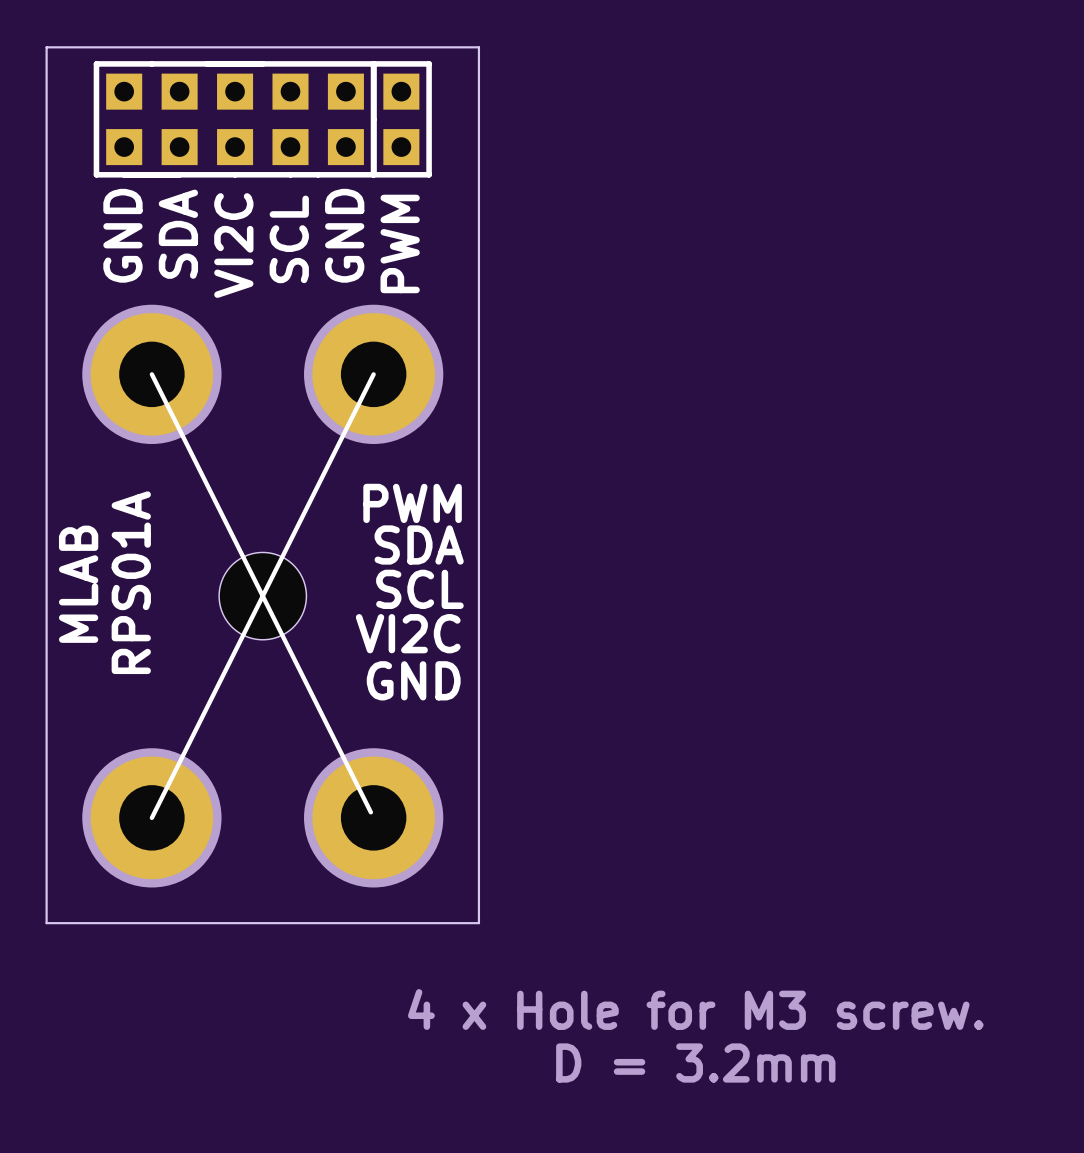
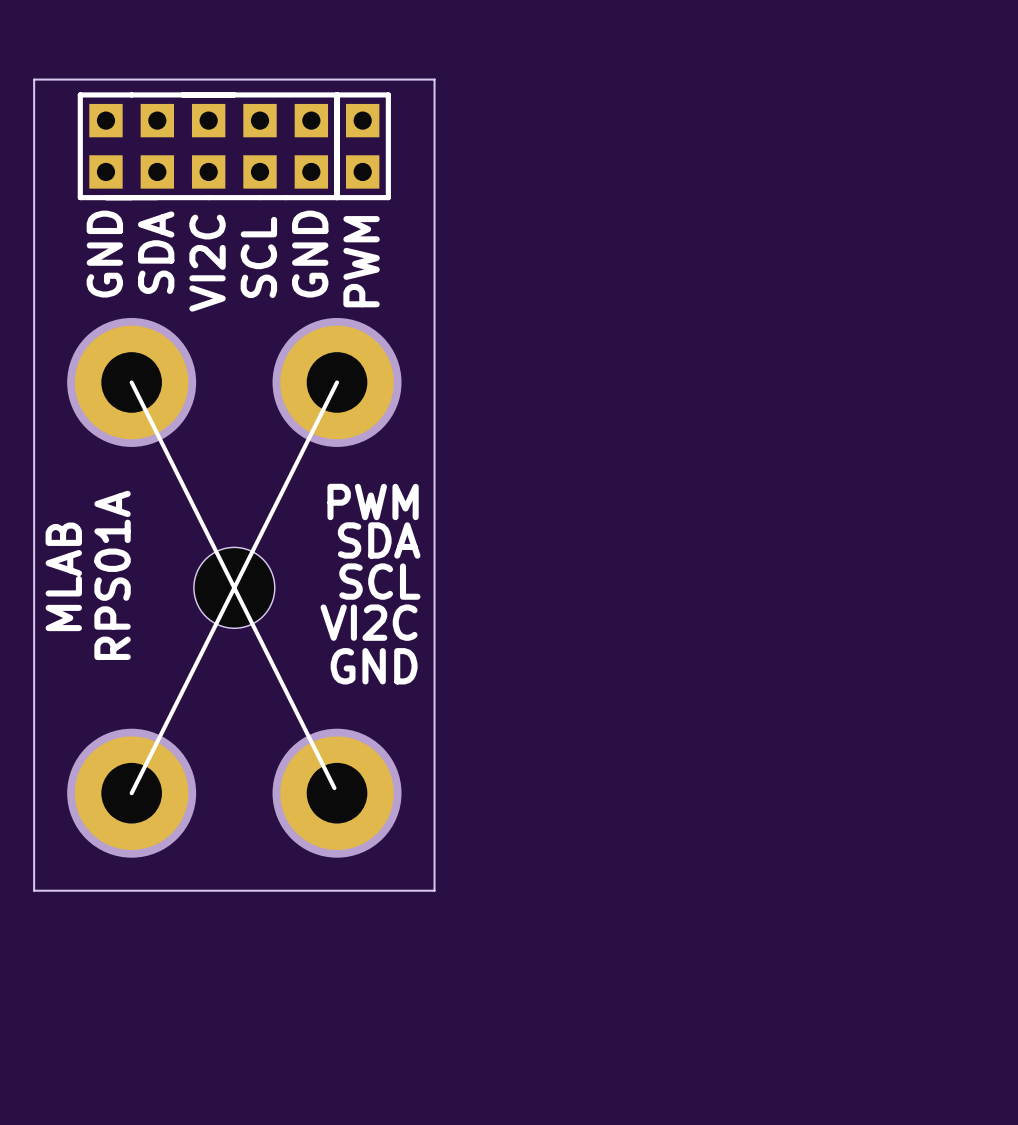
text: 4 x Hole for M3 screw. (695, 1009) -> none
text: D = 3.2mm (695, 1062) -> none

